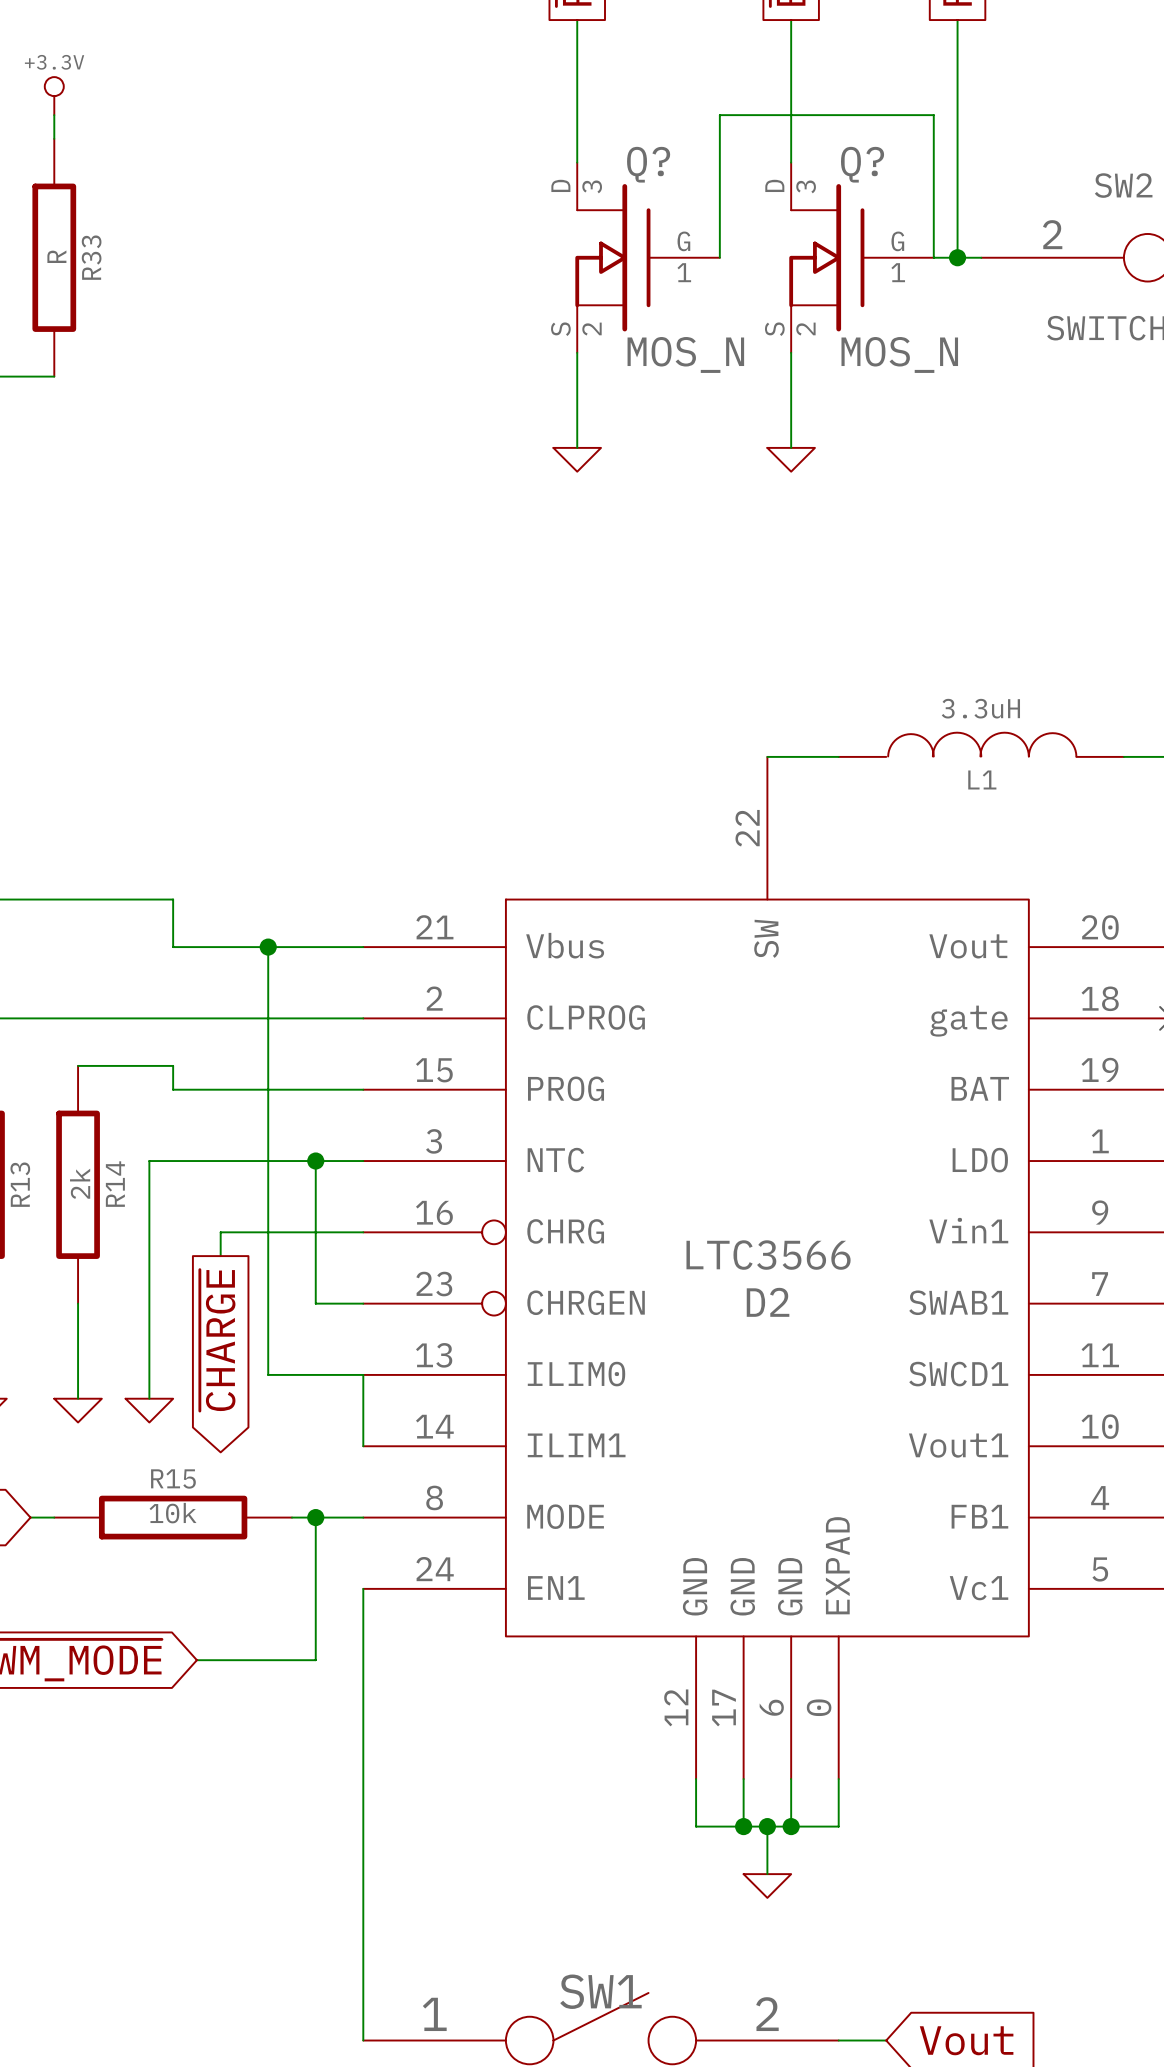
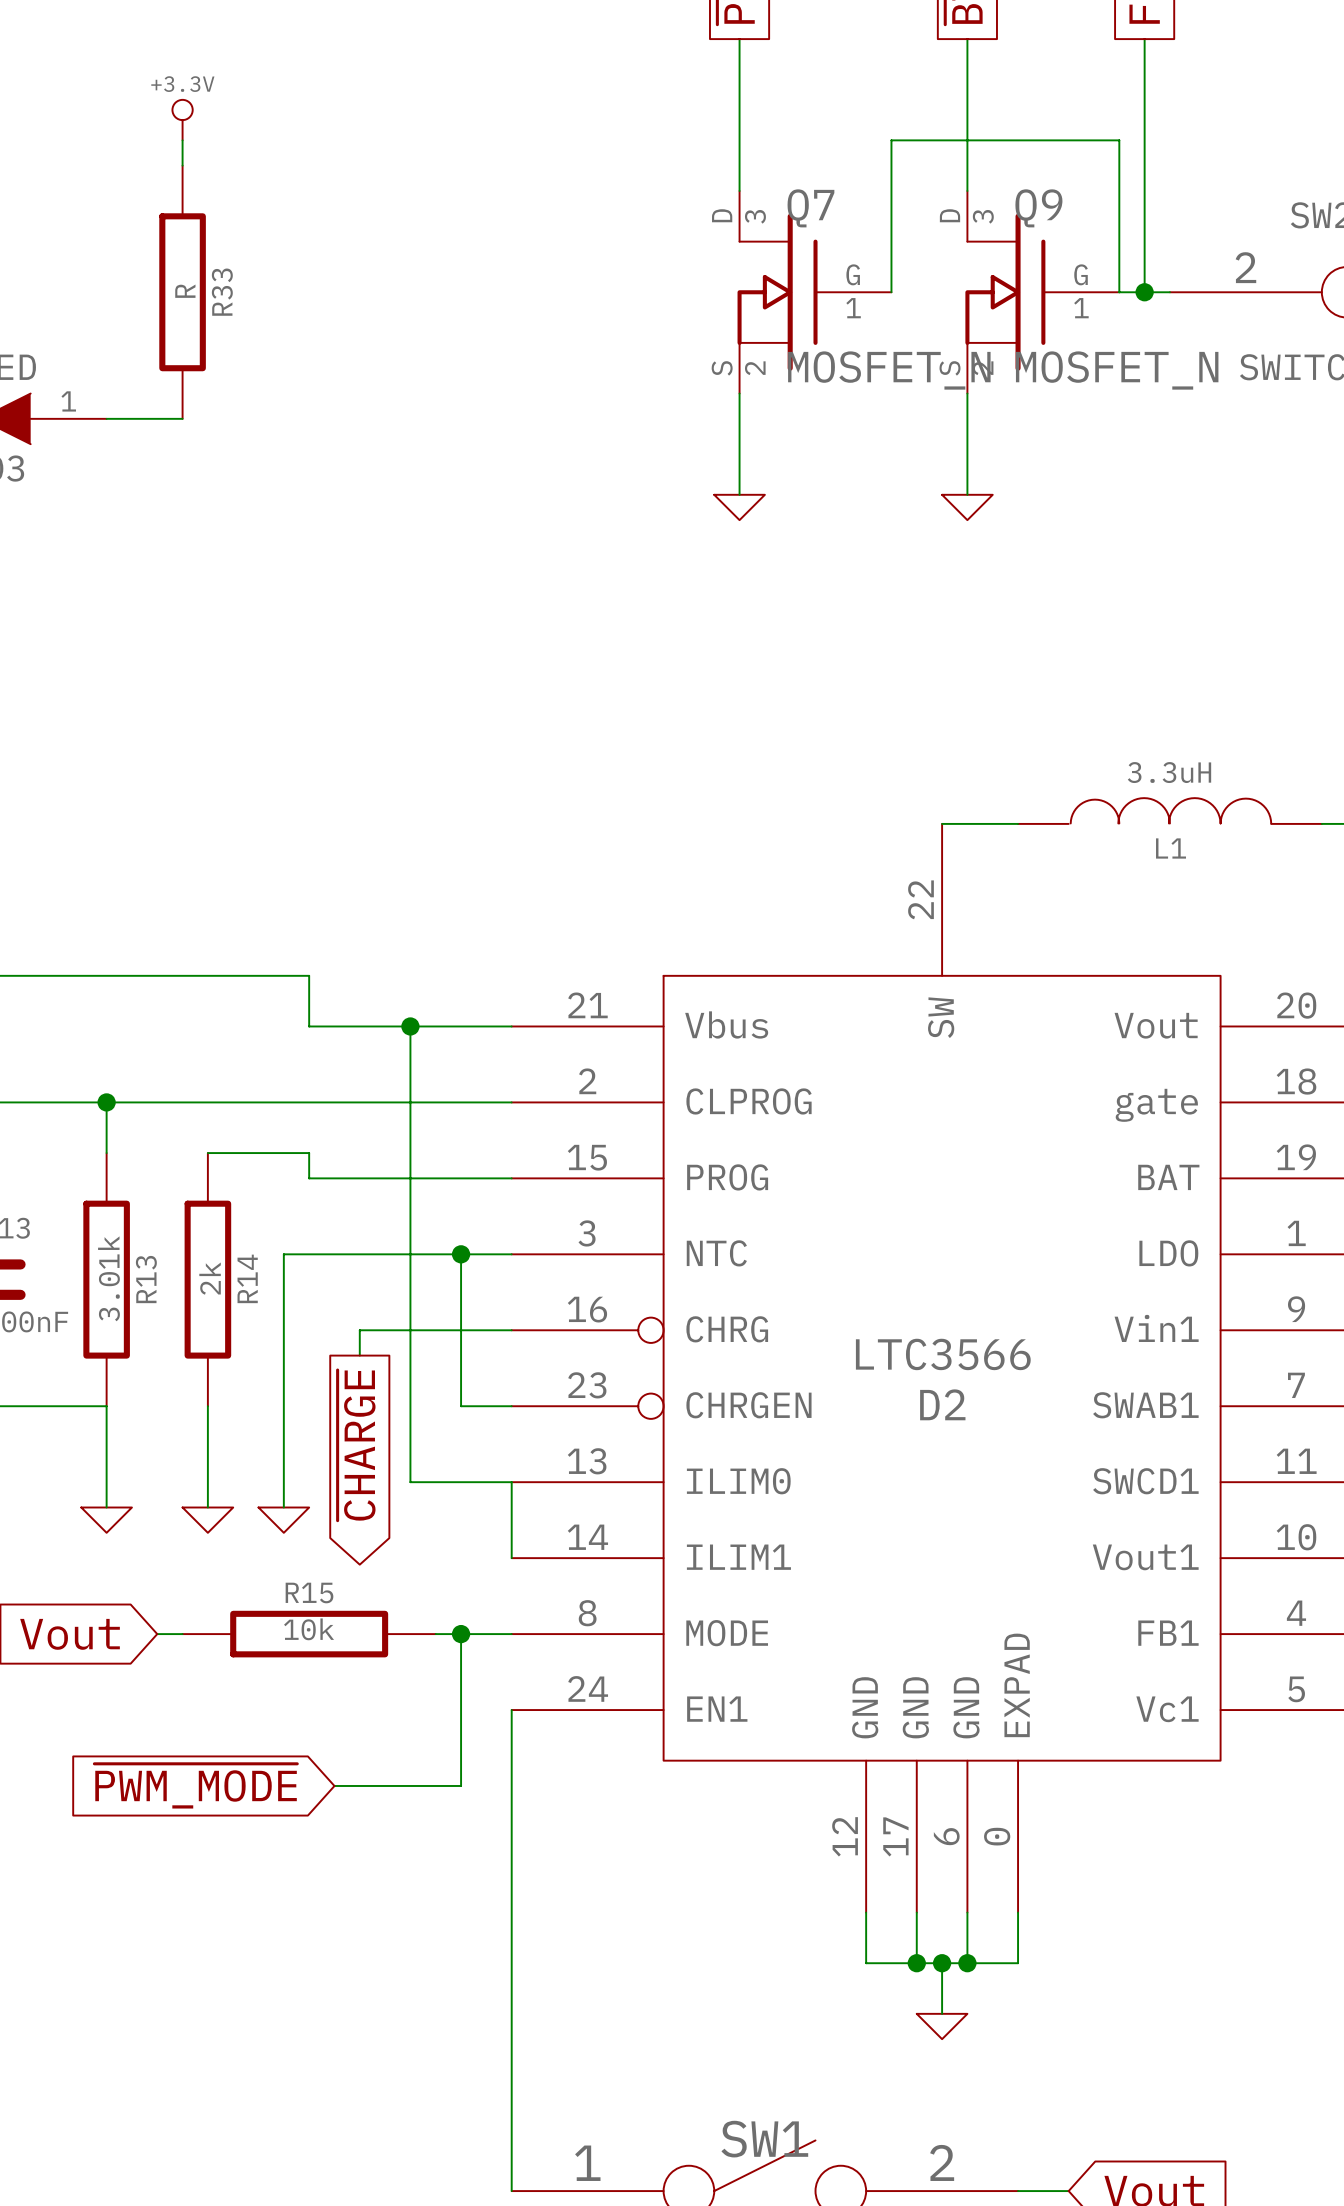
Q? name: Q? (648, 164) -> Q7 (810, 208)
Q? name: Q? (862, 164) -> Q9 (1038, 208)
Q? value: MOS_N (685, 354) -> MOSFET_N (889, 370)
Q? value: MOS_N (899, 354) -> MOSFET_N (1117, 370)

